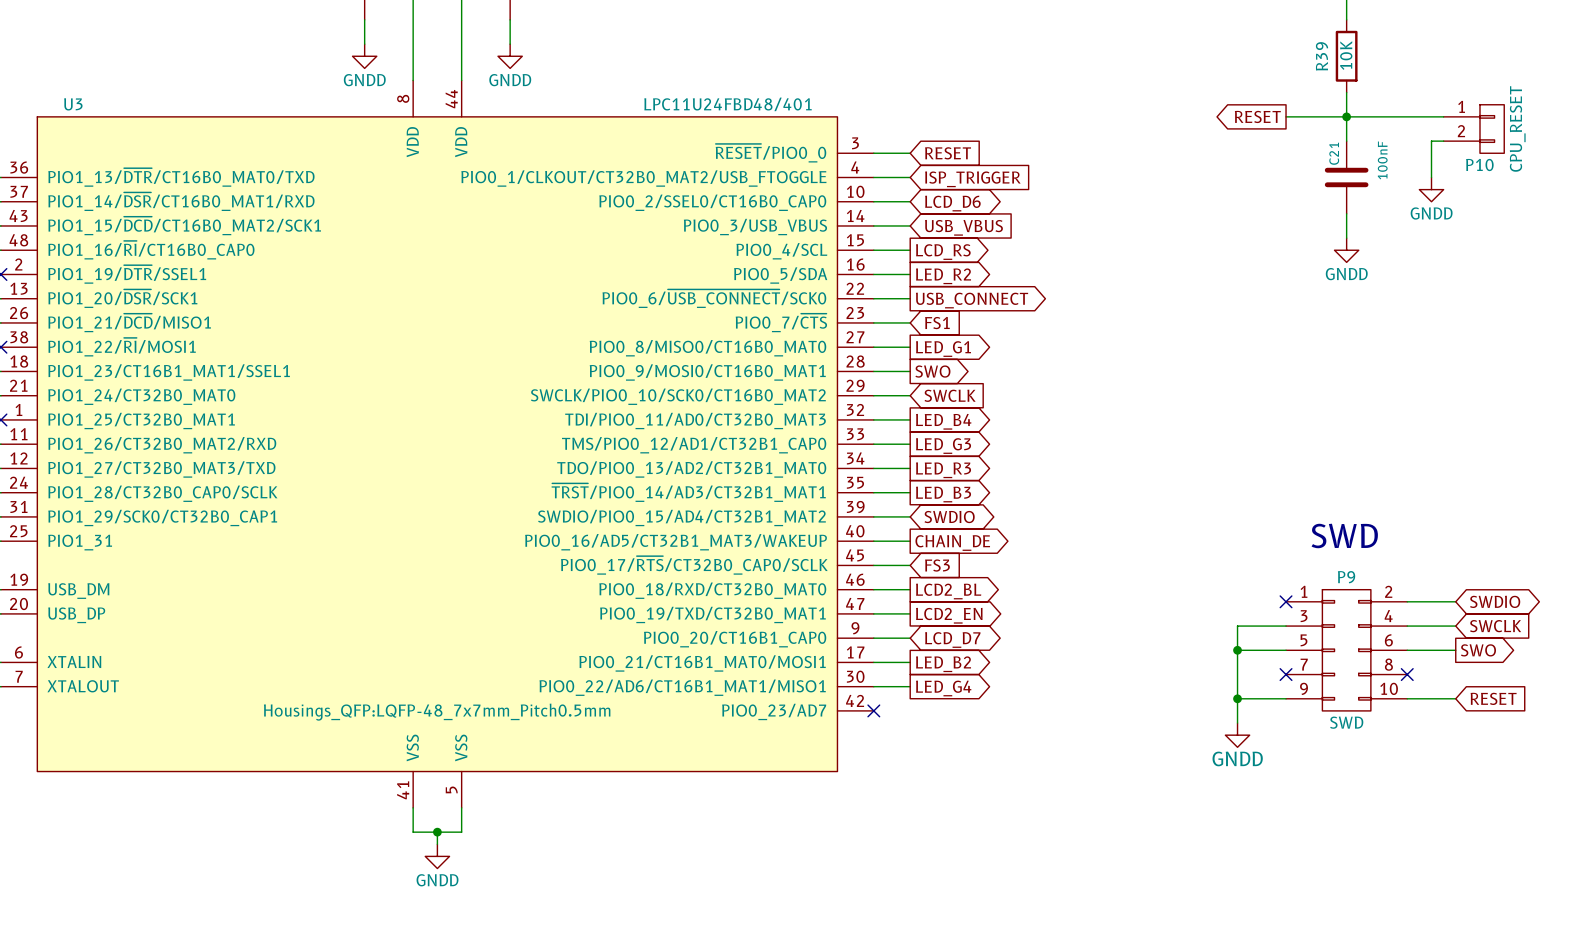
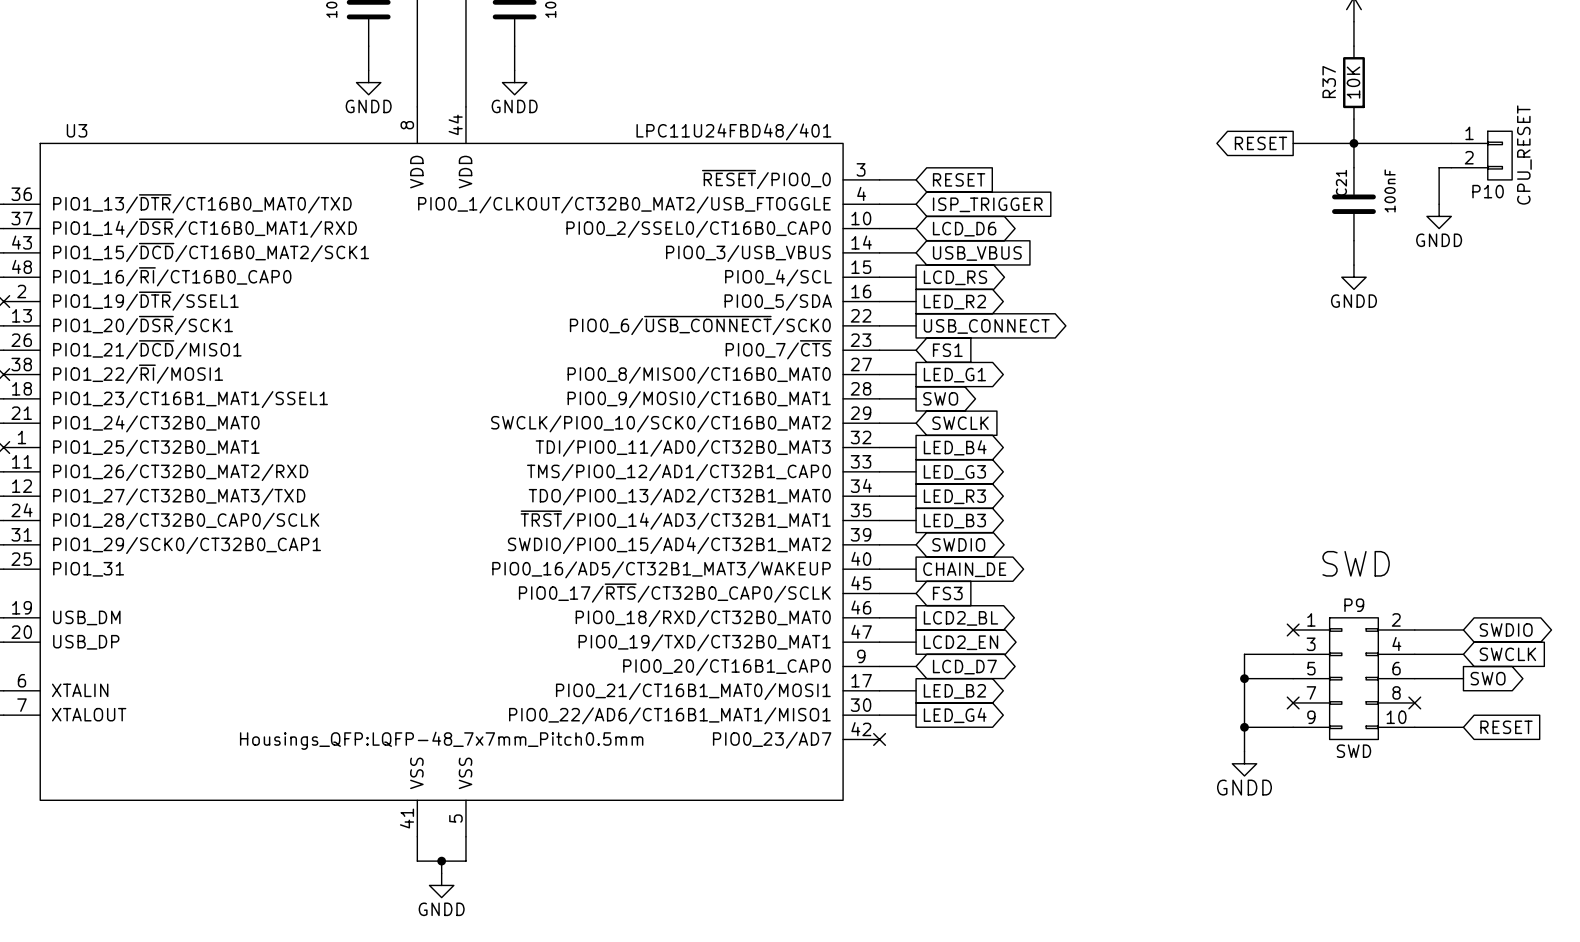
R39 name: R39 (1322, 56) -> R37 (1329, 82)

